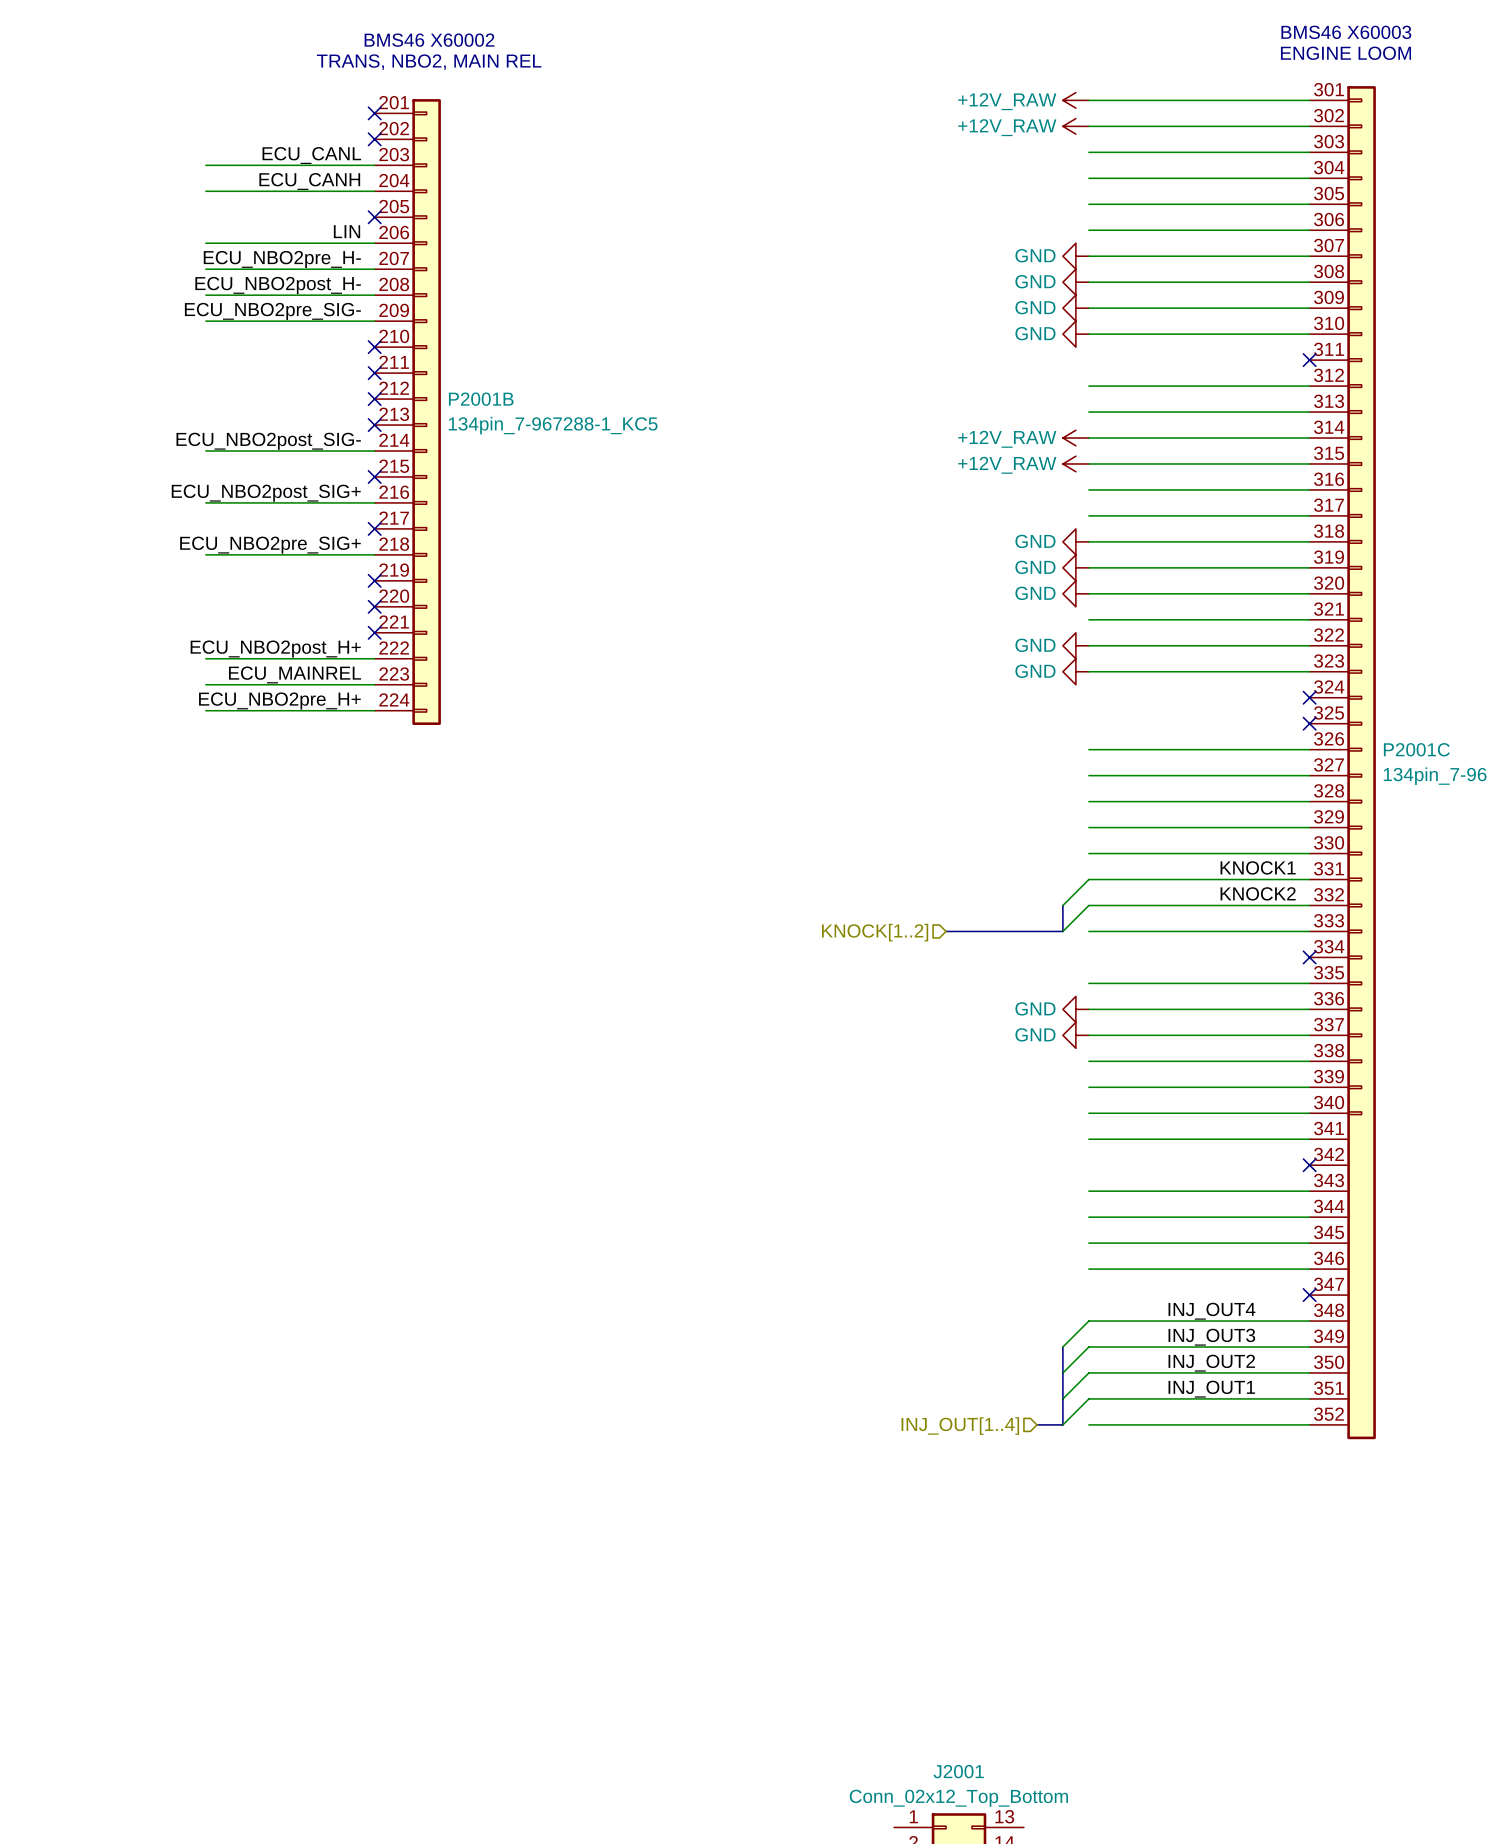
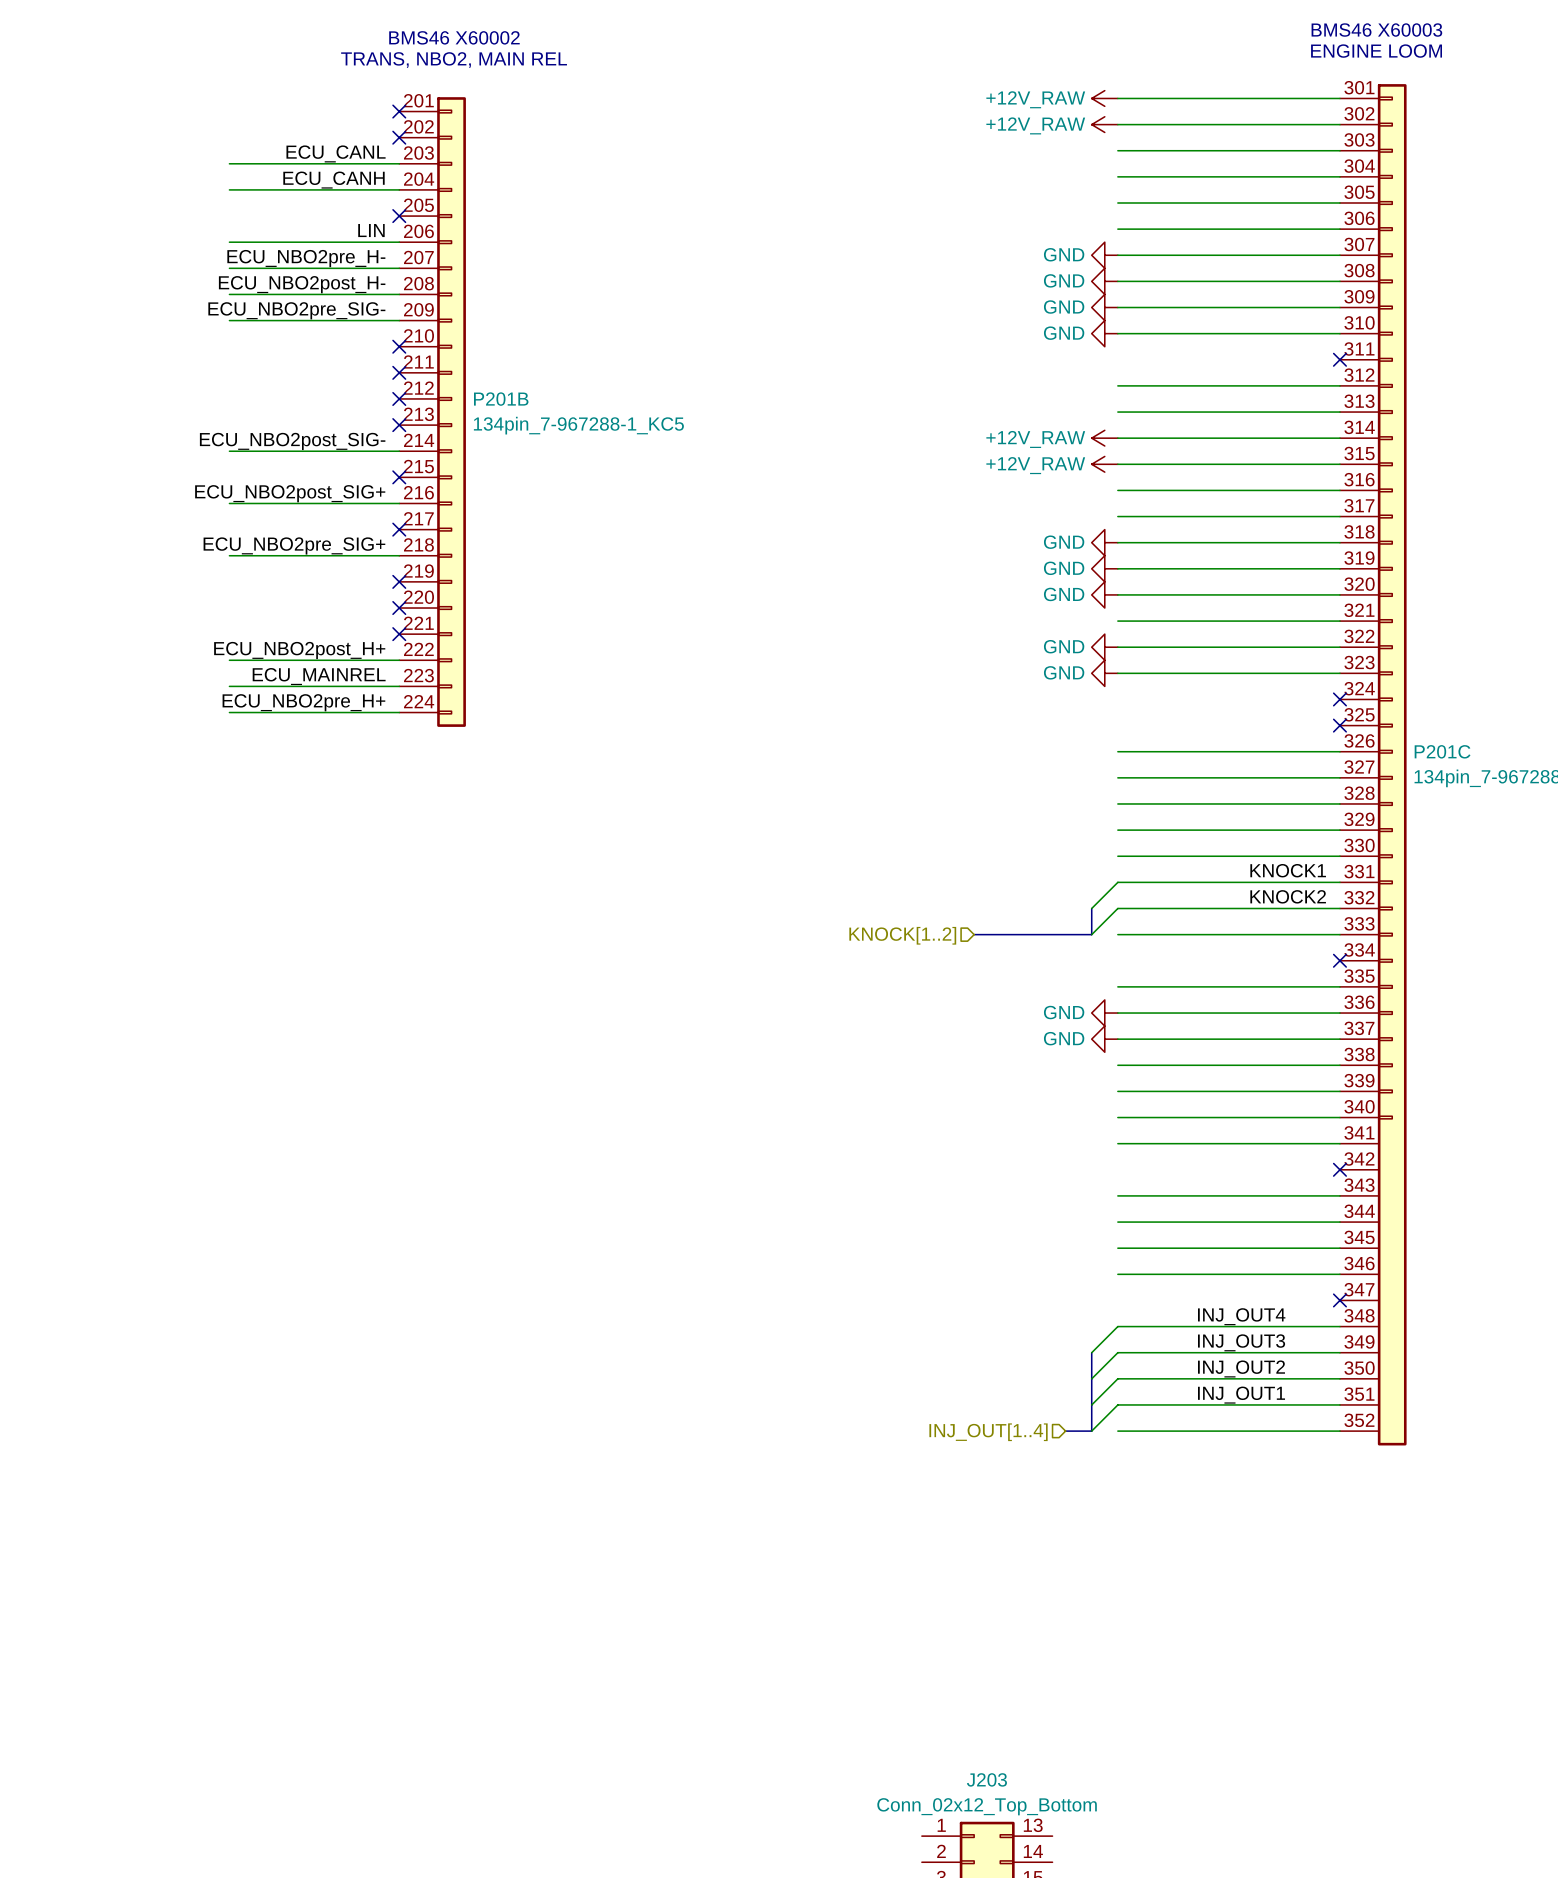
P2001B name: P2001B (481, 399) -> P201B (501, 399)
P2001C name: P2001C (1416, 749) -> P201C (1442, 751)
J2001 name: J2001 (958, 1771) -> J203 (986, 1779)

